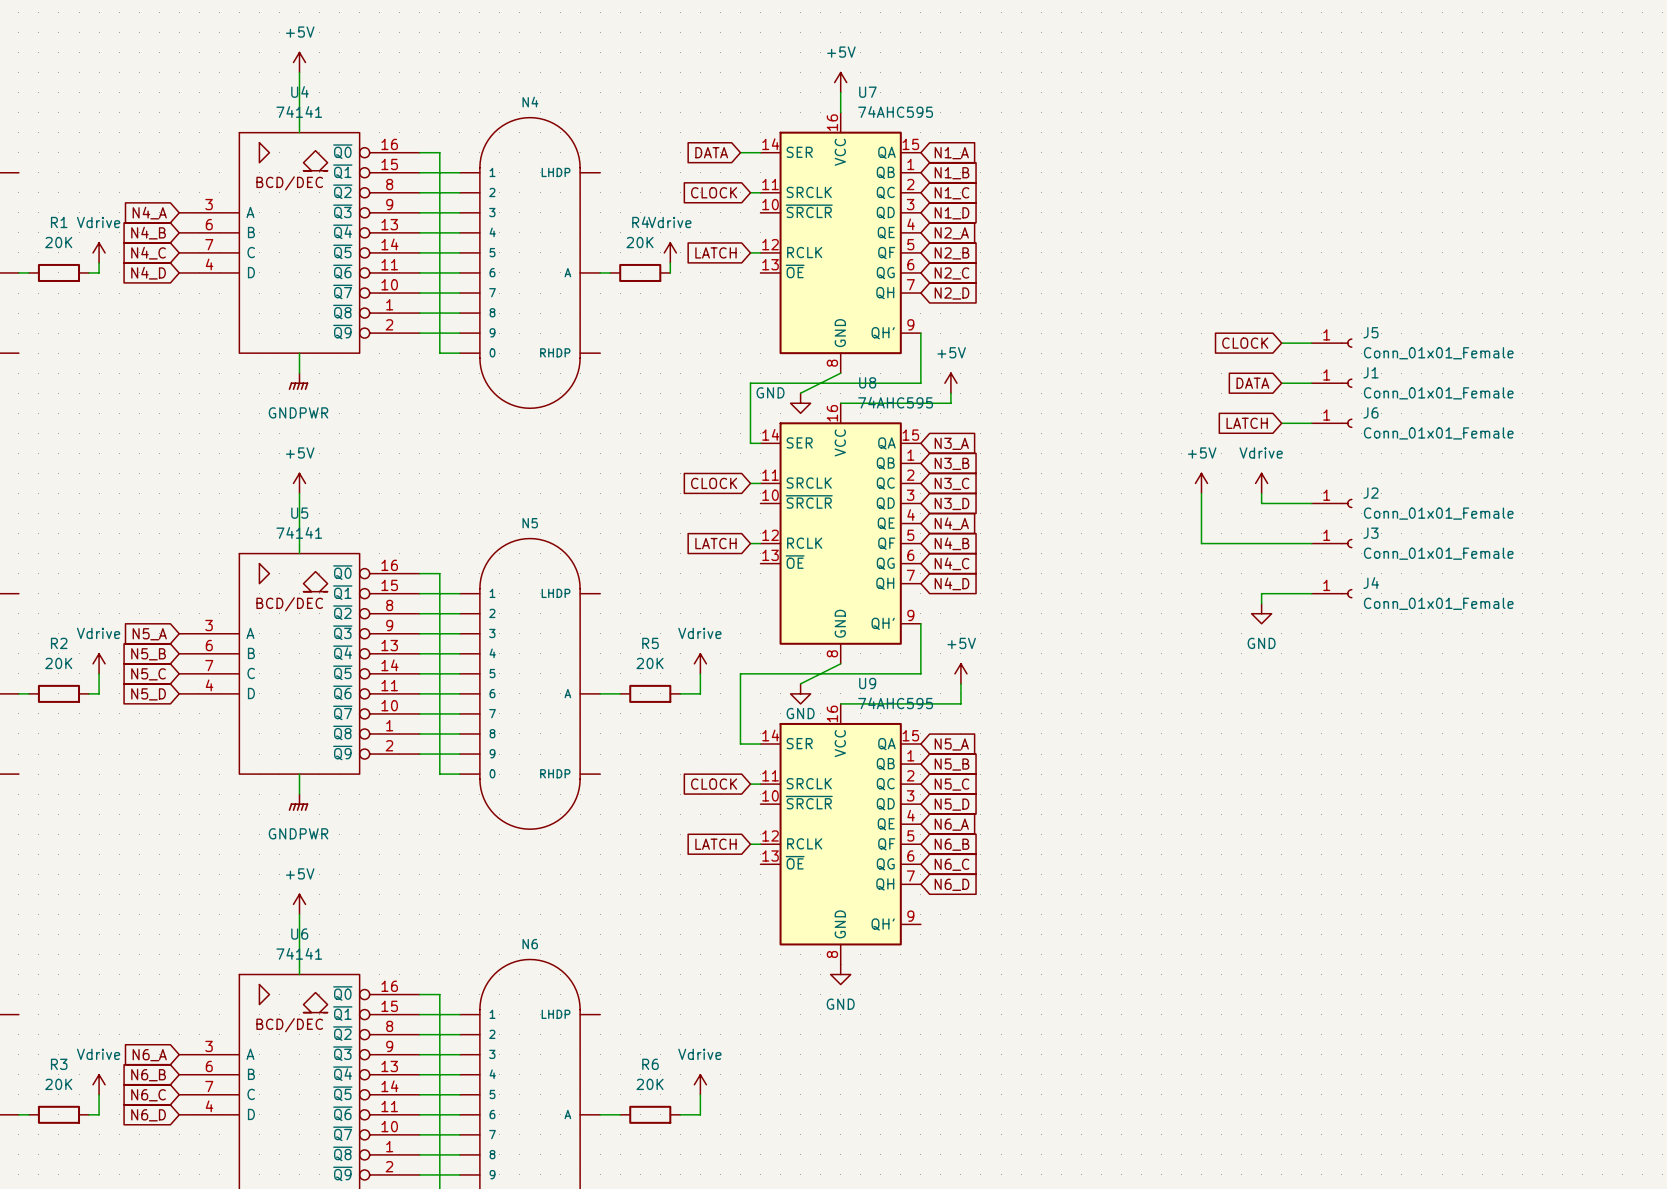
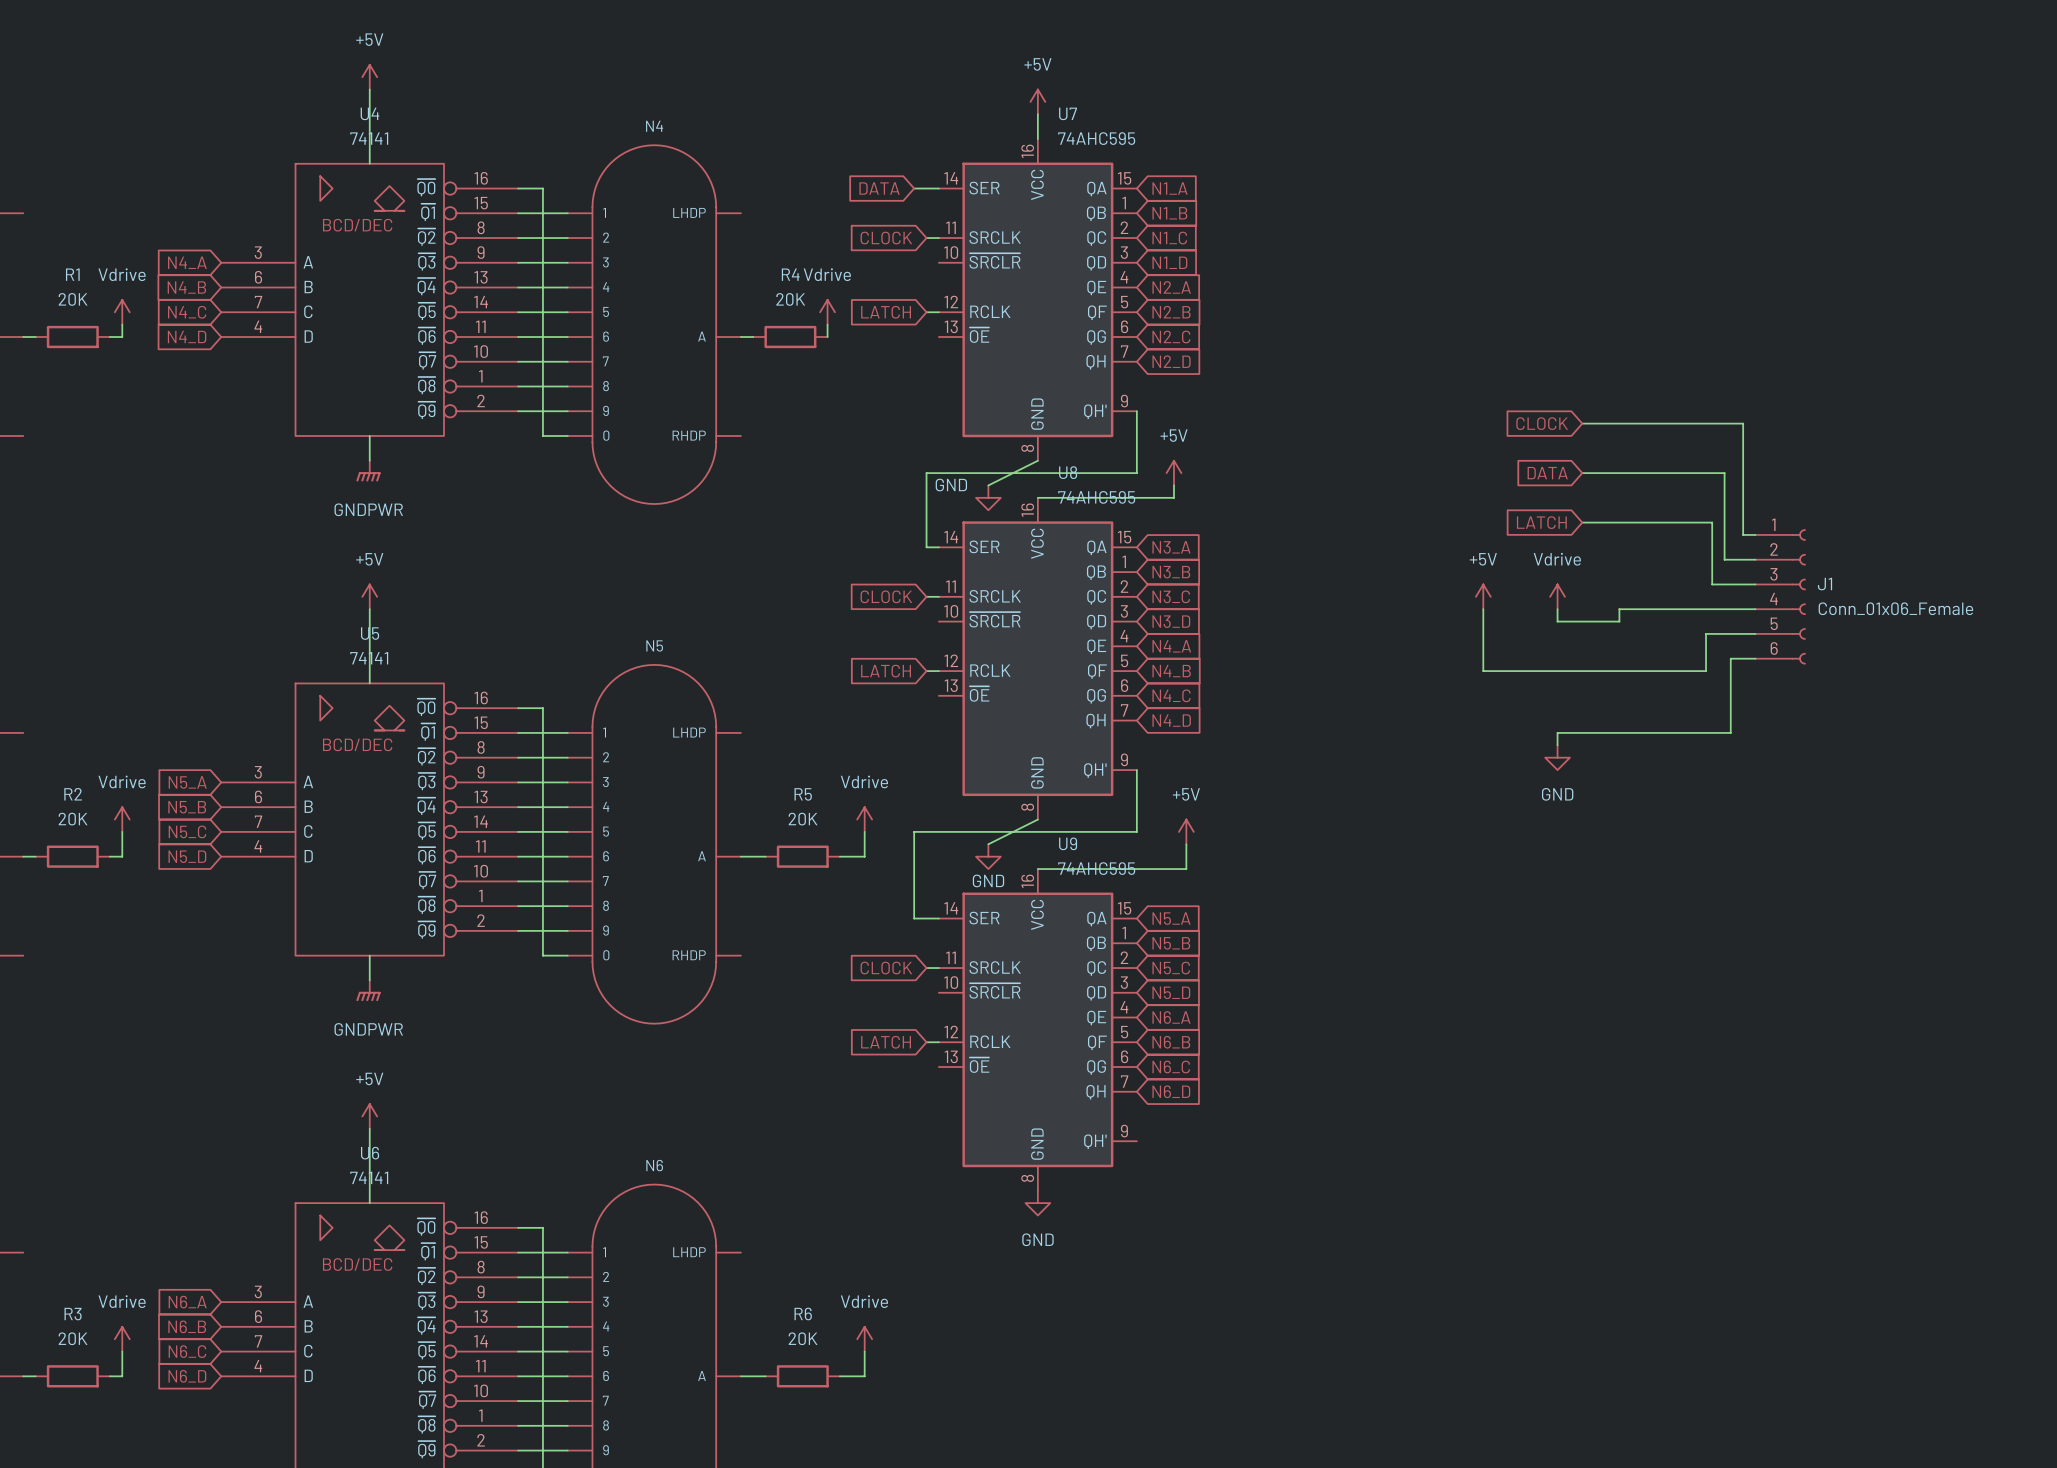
wire: none -> (1619, 423) (1743, 423) (1743, 534) (1755, 534)
J5: Conn_01x01_Female (1332, 343) -> none
J1 symbol: [1311, 378, 1353, 388] -> [1755, 529, 1806, 665]
wire: none -> (1619, 473) (1724, 473) (1724, 559) (1755, 559)
J1 value: Conn_01x01_Female (1438, 393) -> Conn_01x06_Female (1895, 608)
wire: none -> (1619, 522) (1712, 522) (1712, 584) (1755, 584)
J6: Conn_01x01_Female (1332, 423) -> none
wire: none -> (1755, 609) (1619, 609) (1619, 621)
J2: Conn_01x01_Female (1332, 503) -> none
wire: none -> (1755, 633) (1706, 633) (1706, 671) (1619, 671)
wire: none -> (1755, 658) (1730, 658) (1730, 732) (1619, 732)
J3: Conn_01x01_Female (1332, 543) -> none
J4: Conn_01x01_Female (1332, 593) -> none

